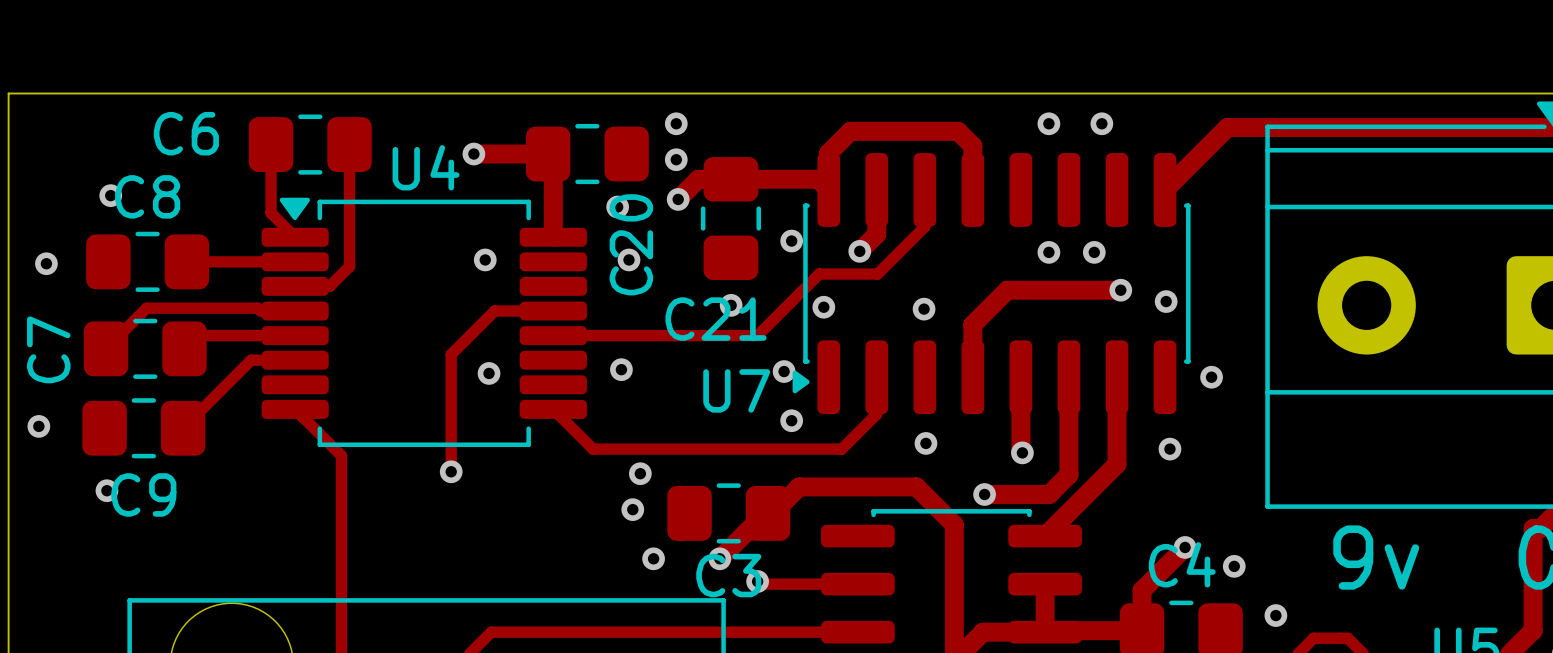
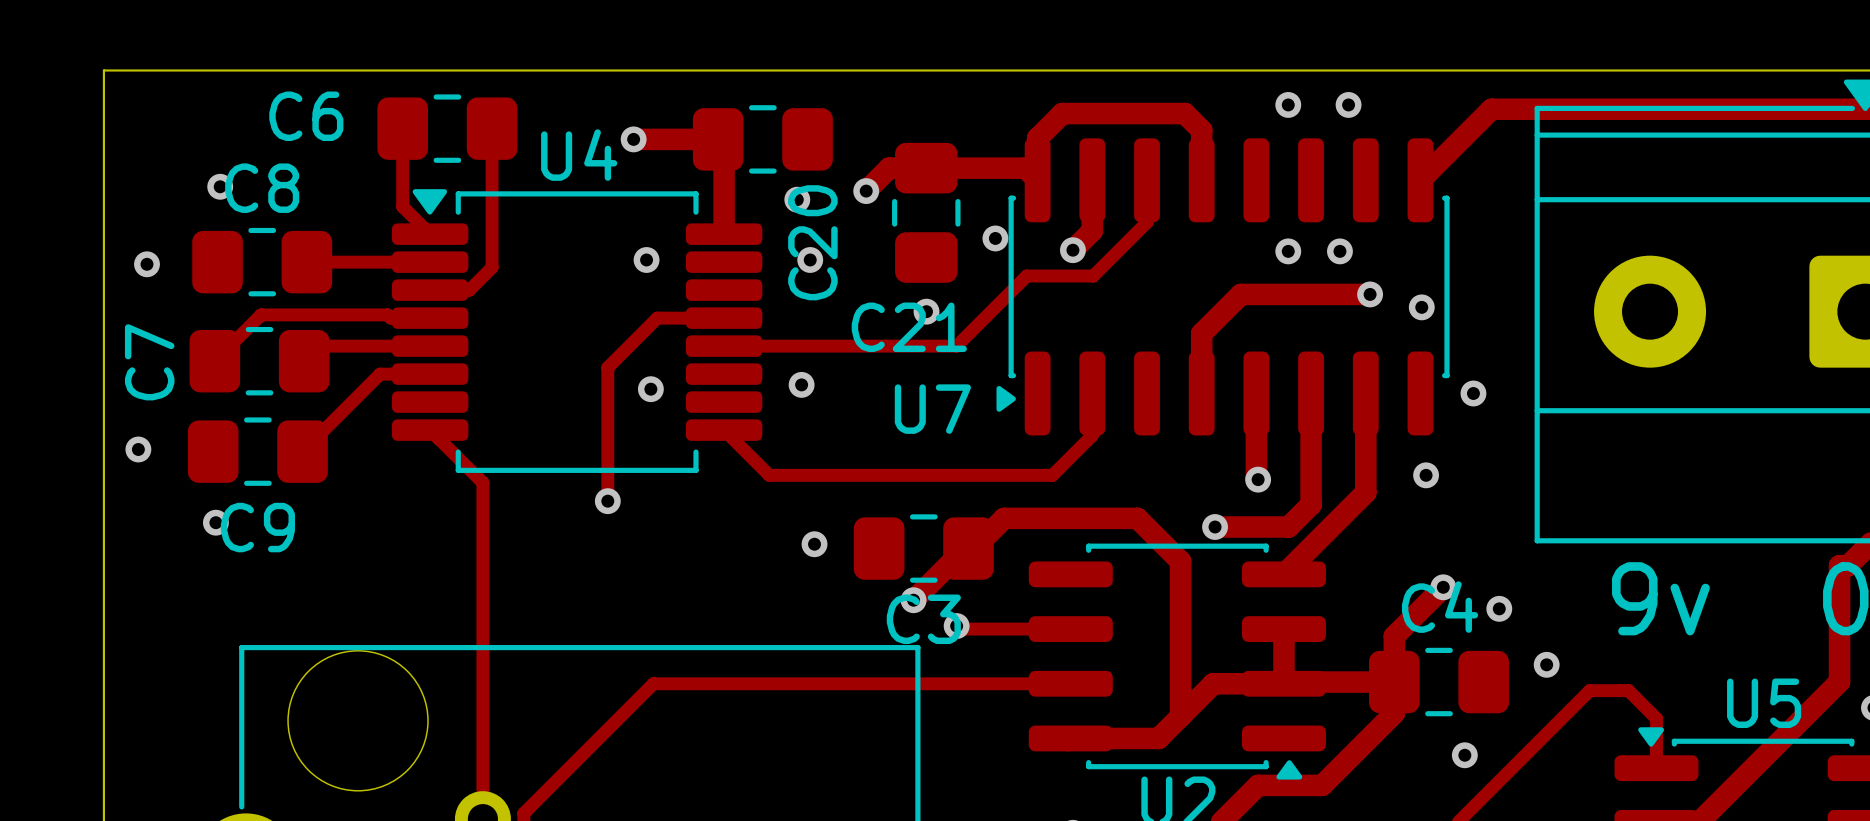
via: (676, 123) -> none
via: (676, 159) -> none
via: (823, 307) -> none
via: (924, 309) -> none
via: (784, 371) -> none
via: (791, 420) -> none
via: (925, 443) -> none
via: (640, 473) -> none
via: (653, 558) -> none

